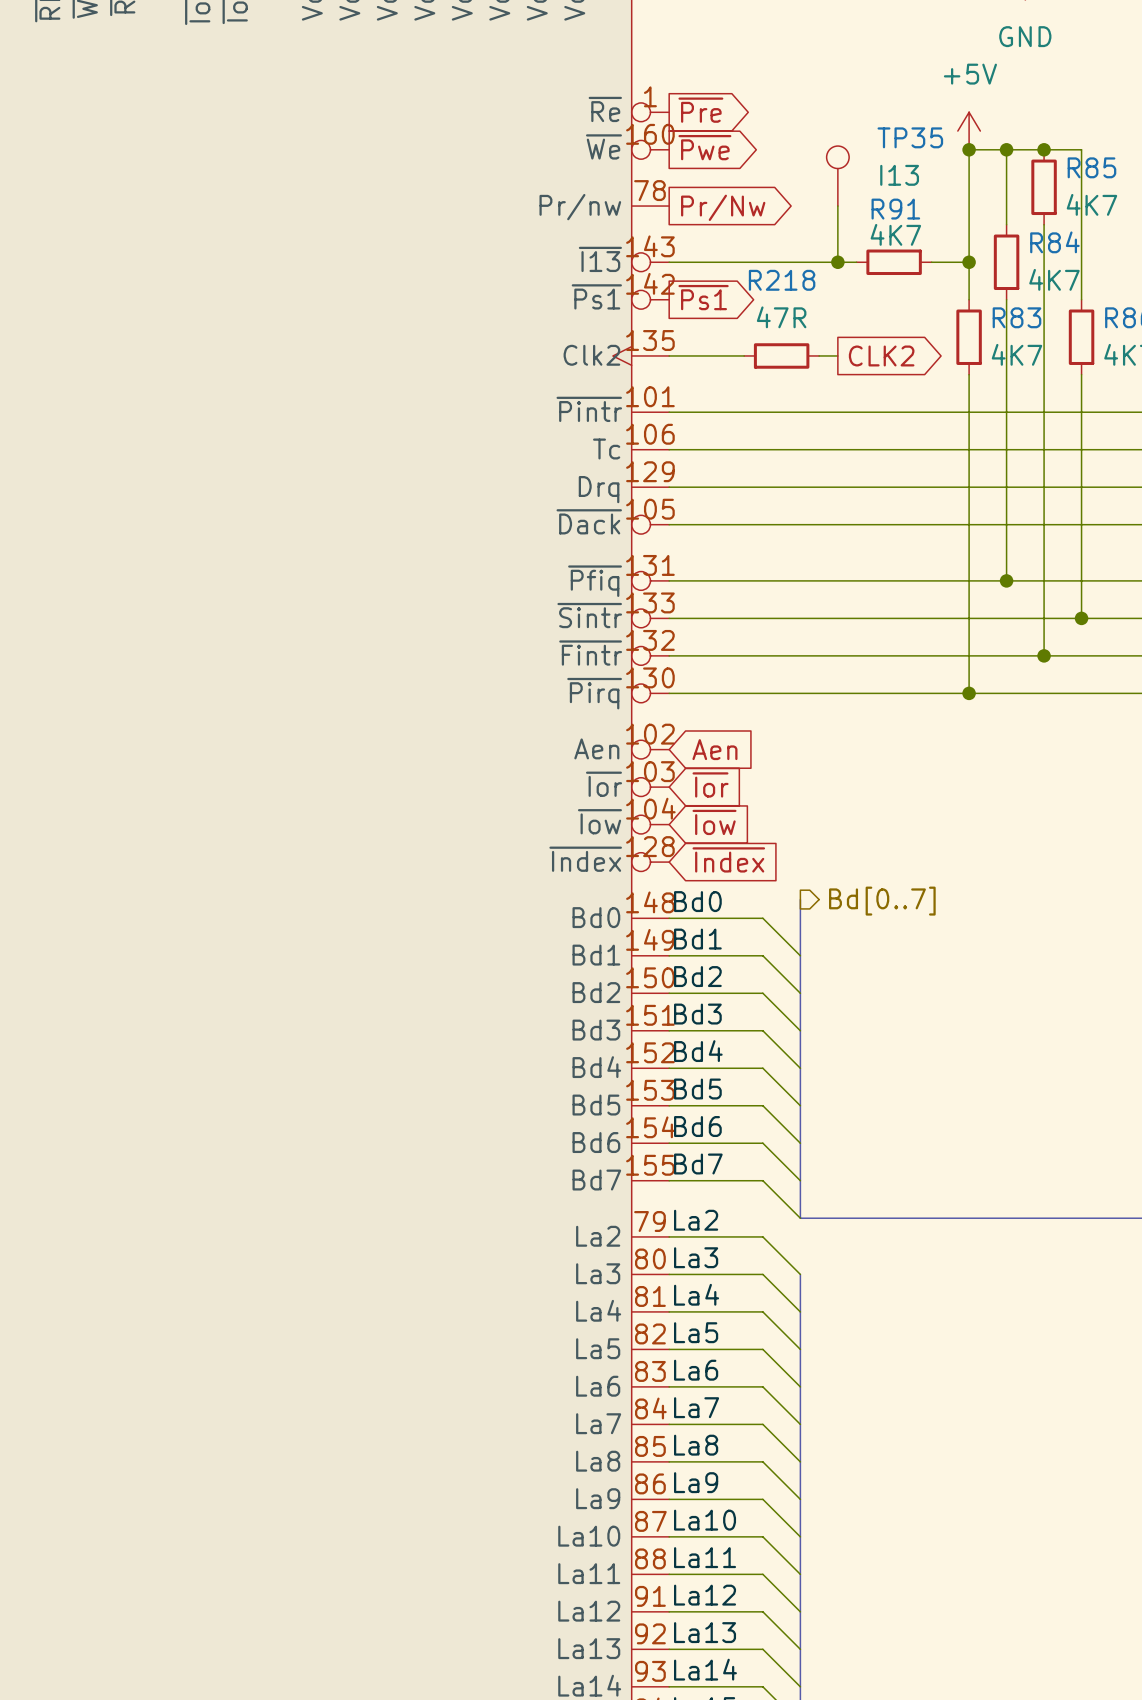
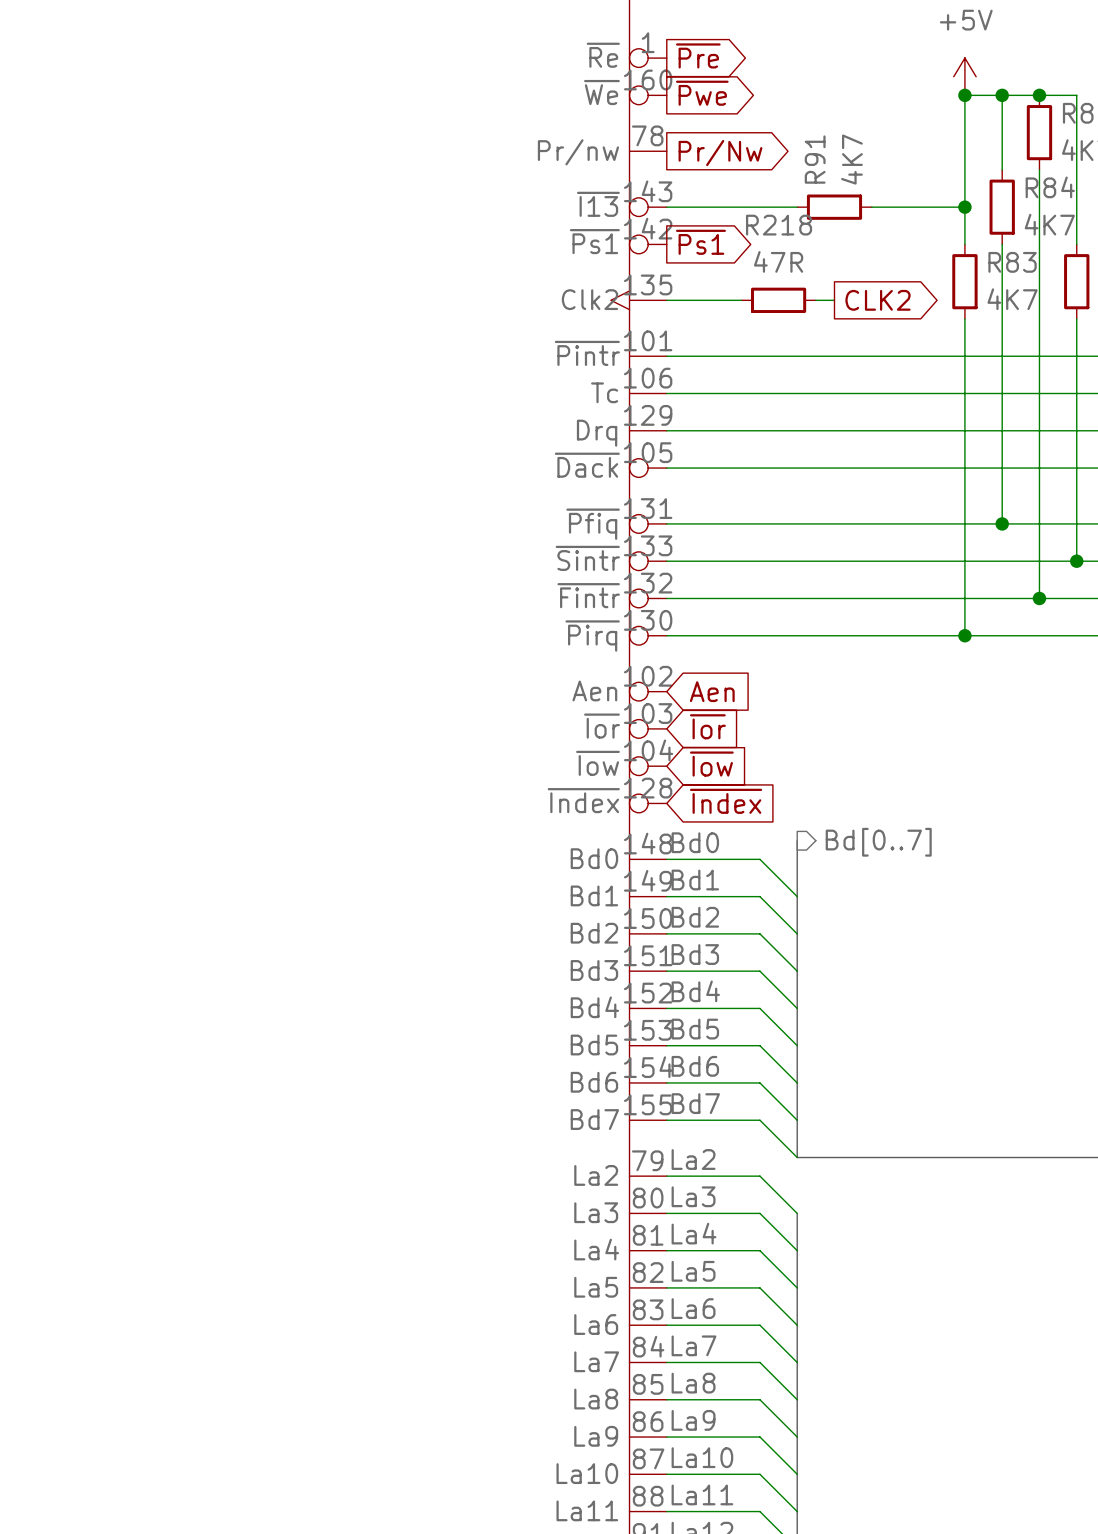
TP35: I13 (837, 176) -> none
wire: (837, 206) (837, 262) -> none
R91 name rotation: 0° (895, 209) -> 90° counterclockwise (815, 159)
R91 value rotation: 0° (895, 234) -> 90° counterclockwise (851, 159)
wire: (800, 262) (856, 262) -> (871, 207) (927, 207)
junction: (837, 262) -> none
R91 position: (894, 262) -> (834, 207)

